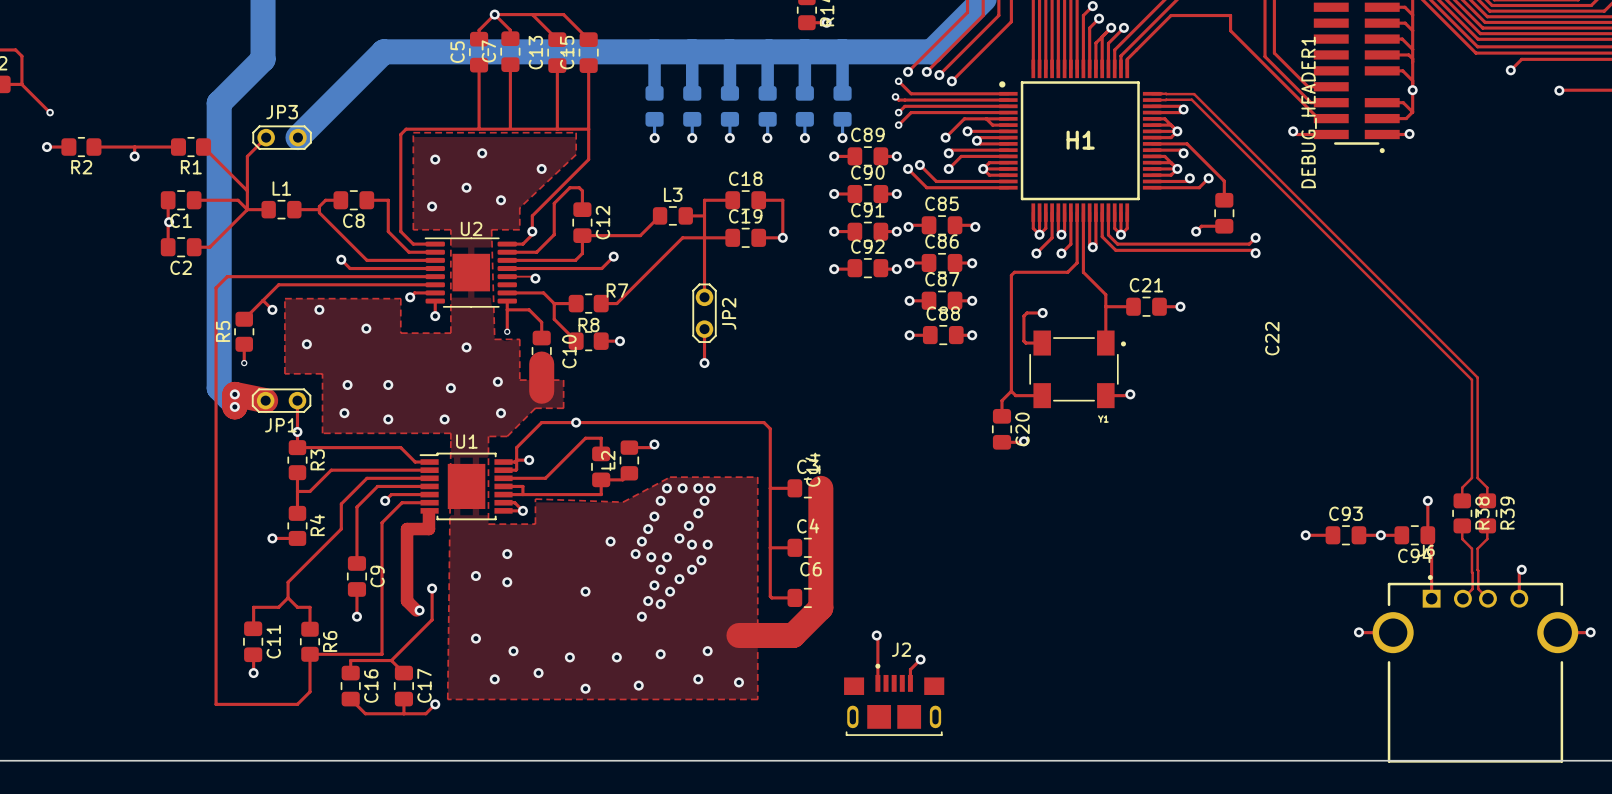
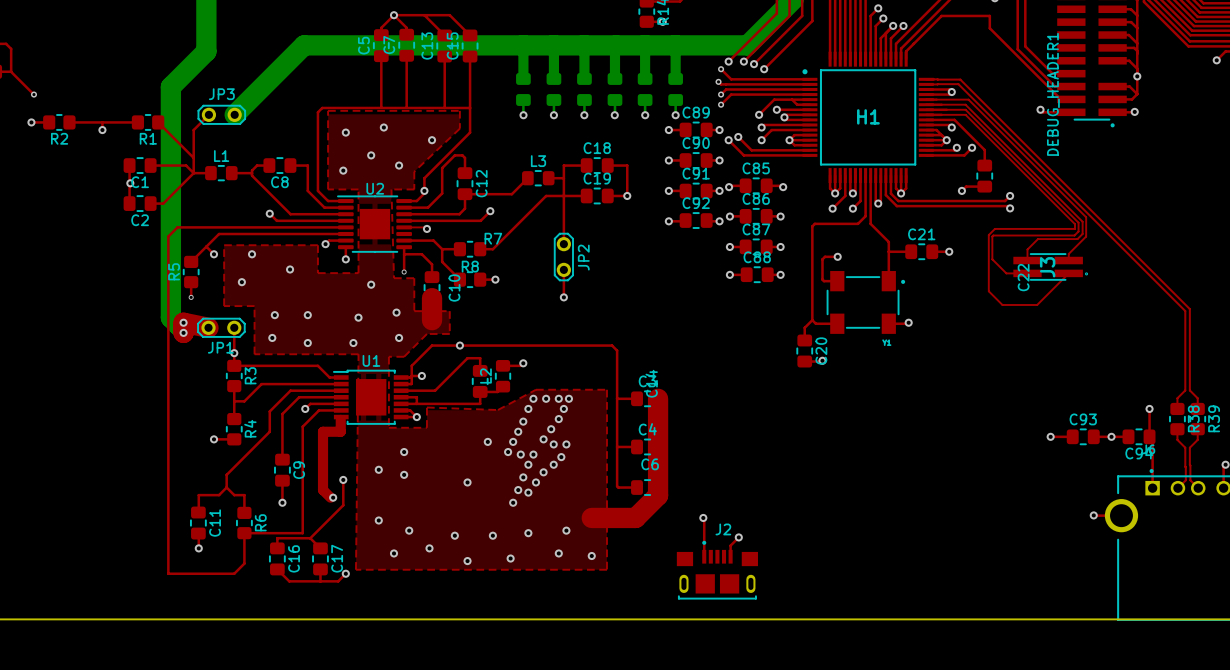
top track: (1164, 118) (1177, 131) (1171, 137) -> (936, 99) (968, 99) (1086, 217) (1086, 236) (1068, 253) (1068, 260)
top track: none -> (941, 104) (965, 104) (1082, 221) (1082, 234) (1077, 239) (1037, 239) (1027, 249) (1027, 260)
top track: none -> (946, 109) (965, 109) (1078, 222) (1078, 231) (1074, 235) (993, 235) (992, 259) (1006, 273) (1027, 273)
via: (1177, 131) -> none
top track: none -> (941, 114) (965, 114) (1075, 224) (1075, 228) (994, 228) (988, 235) (988, 291) (1002, 304) (1037, 304) (1068, 273)
J3: none -> (1050, 266)

